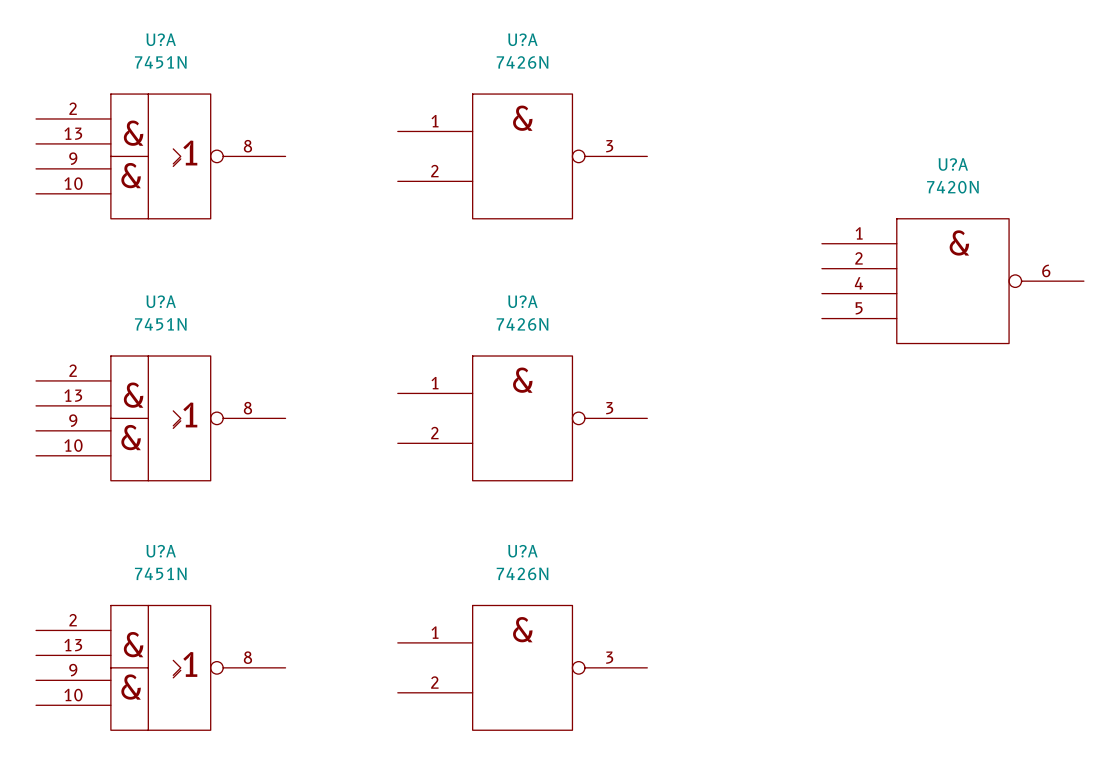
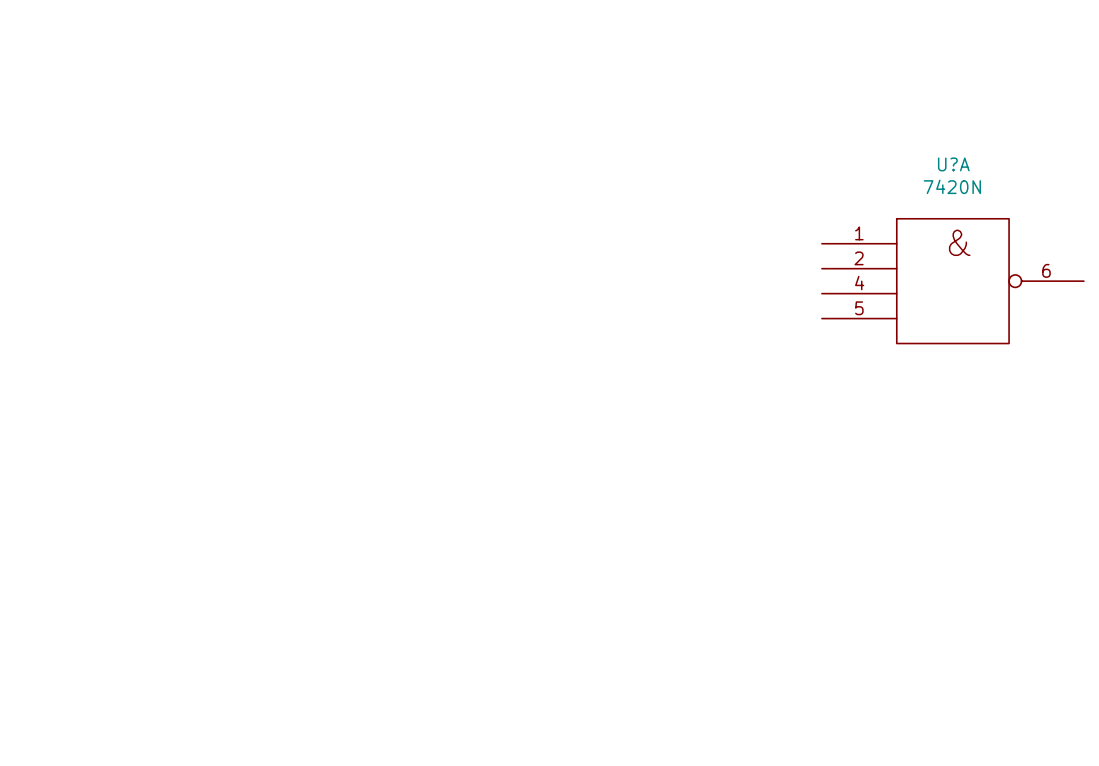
U?A: 7451N (160, 156) -> none
U?A: 7426N (522, 156) -> none
U?A: 7451N (160, 418) -> none
U?A: 7426N (522, 418) -> none
U?A: 7451N (160, 667) -> none
U?A: 7426N (522, 667) -> none

